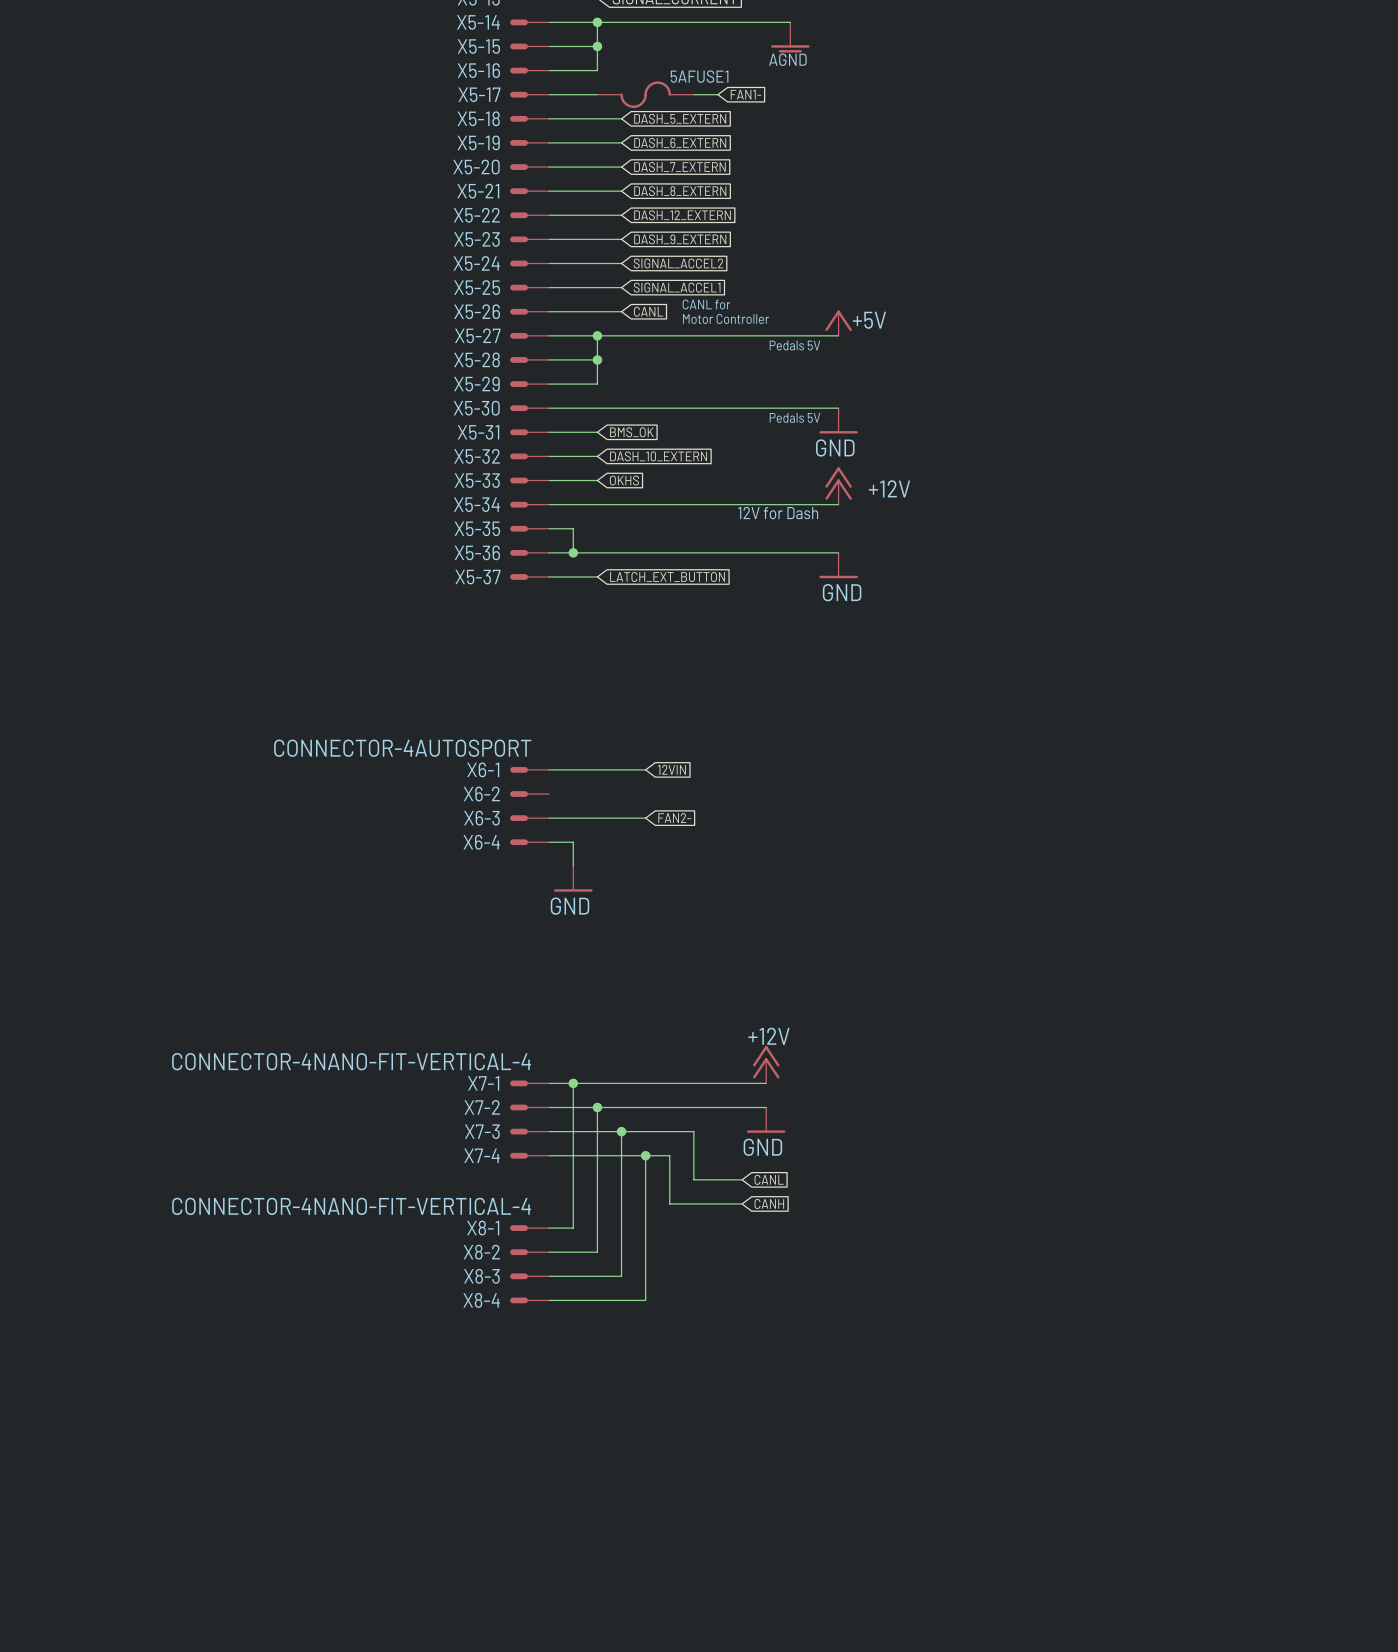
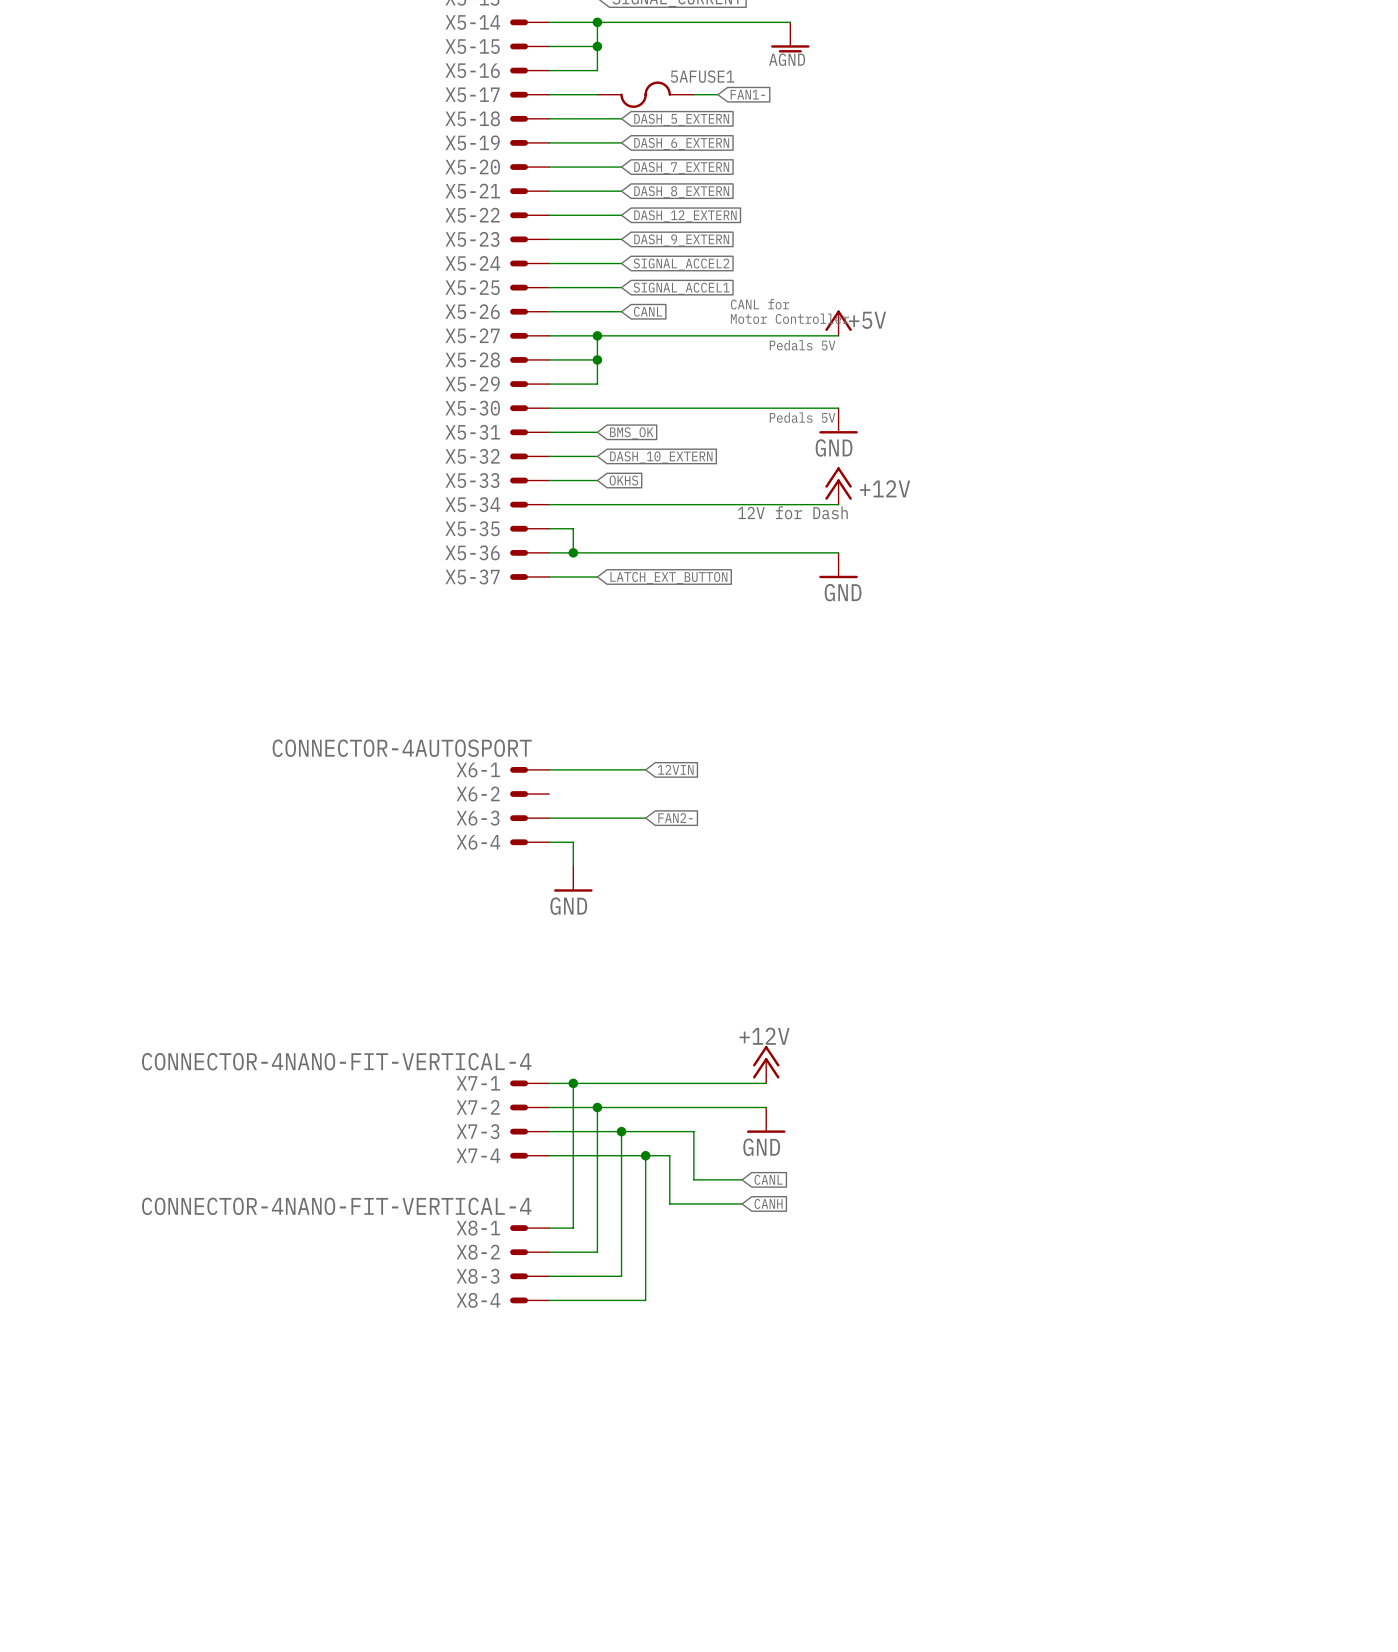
text position: CANL for (706, 304) -> CANL for (760, 304)
text position: Motor Controller (726, 318) -> Motor Controller (789, 318)

